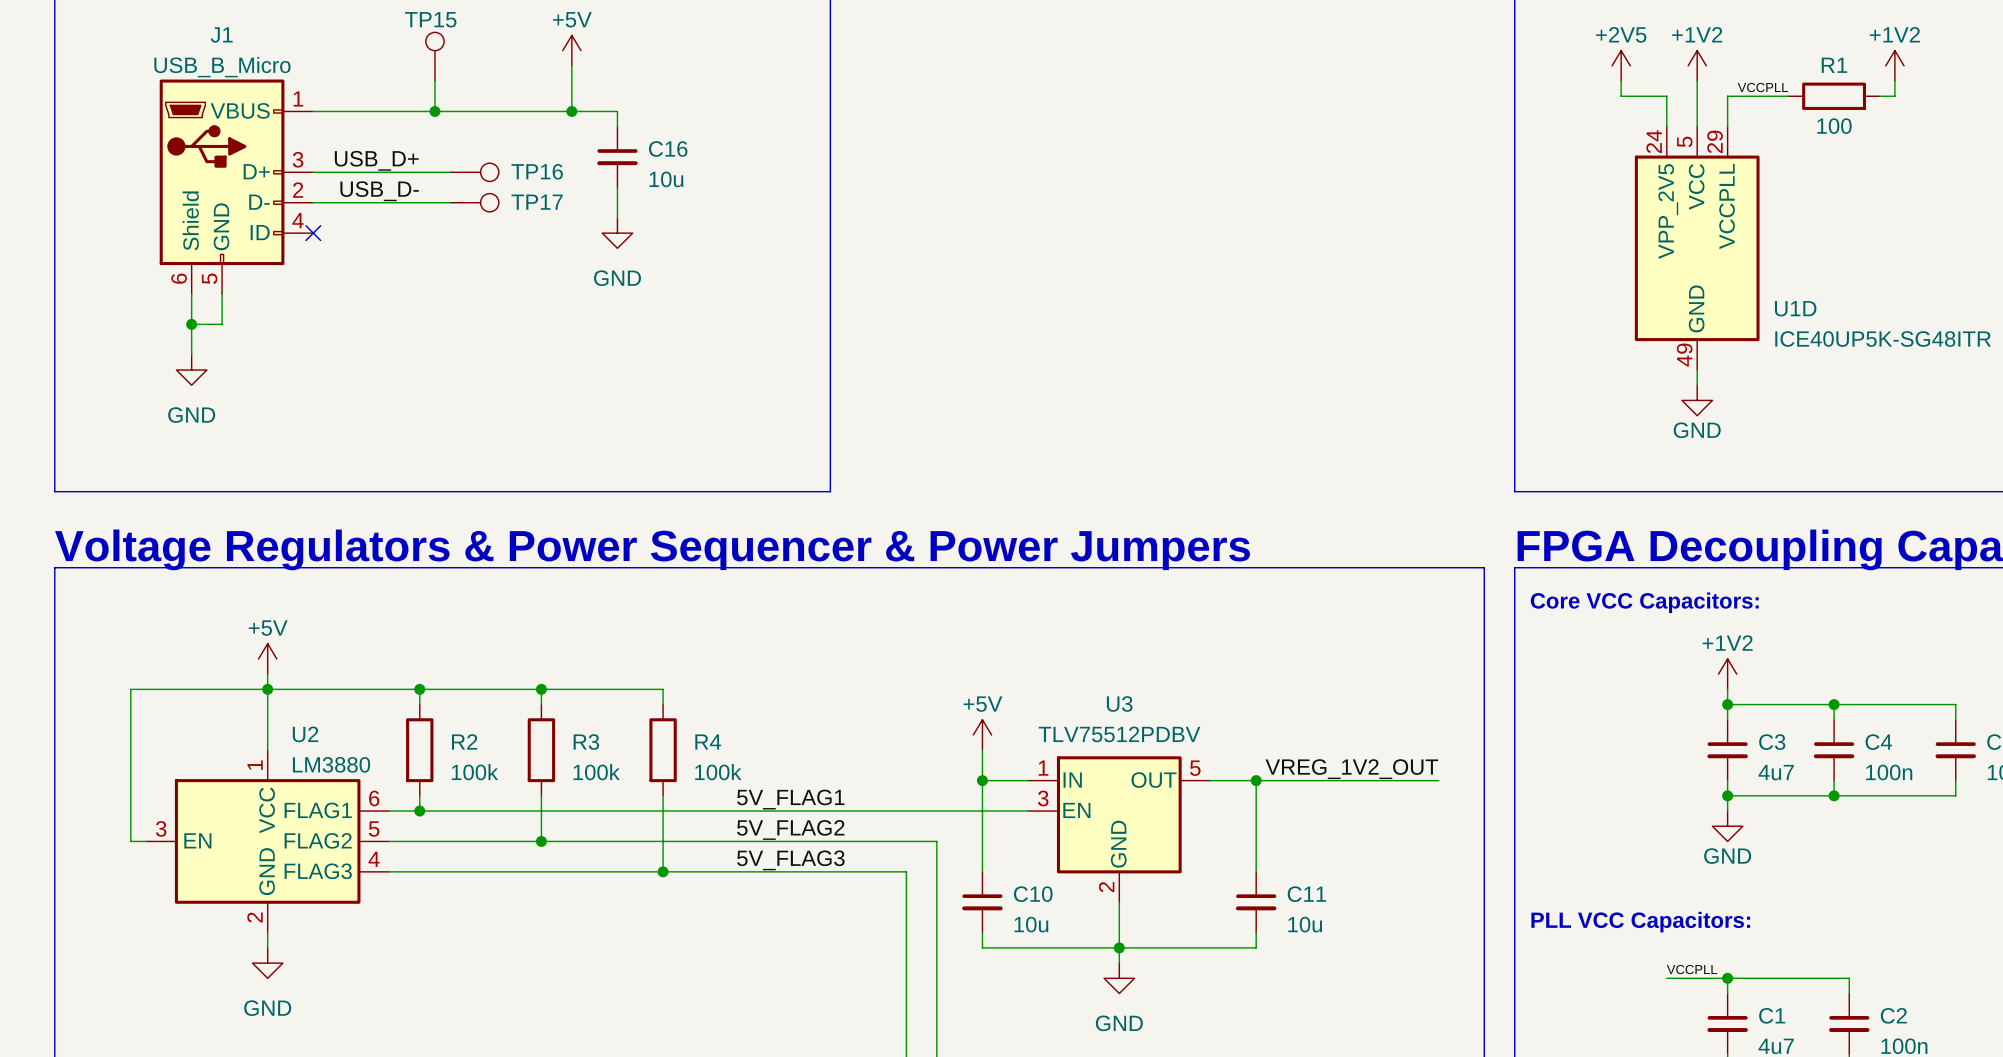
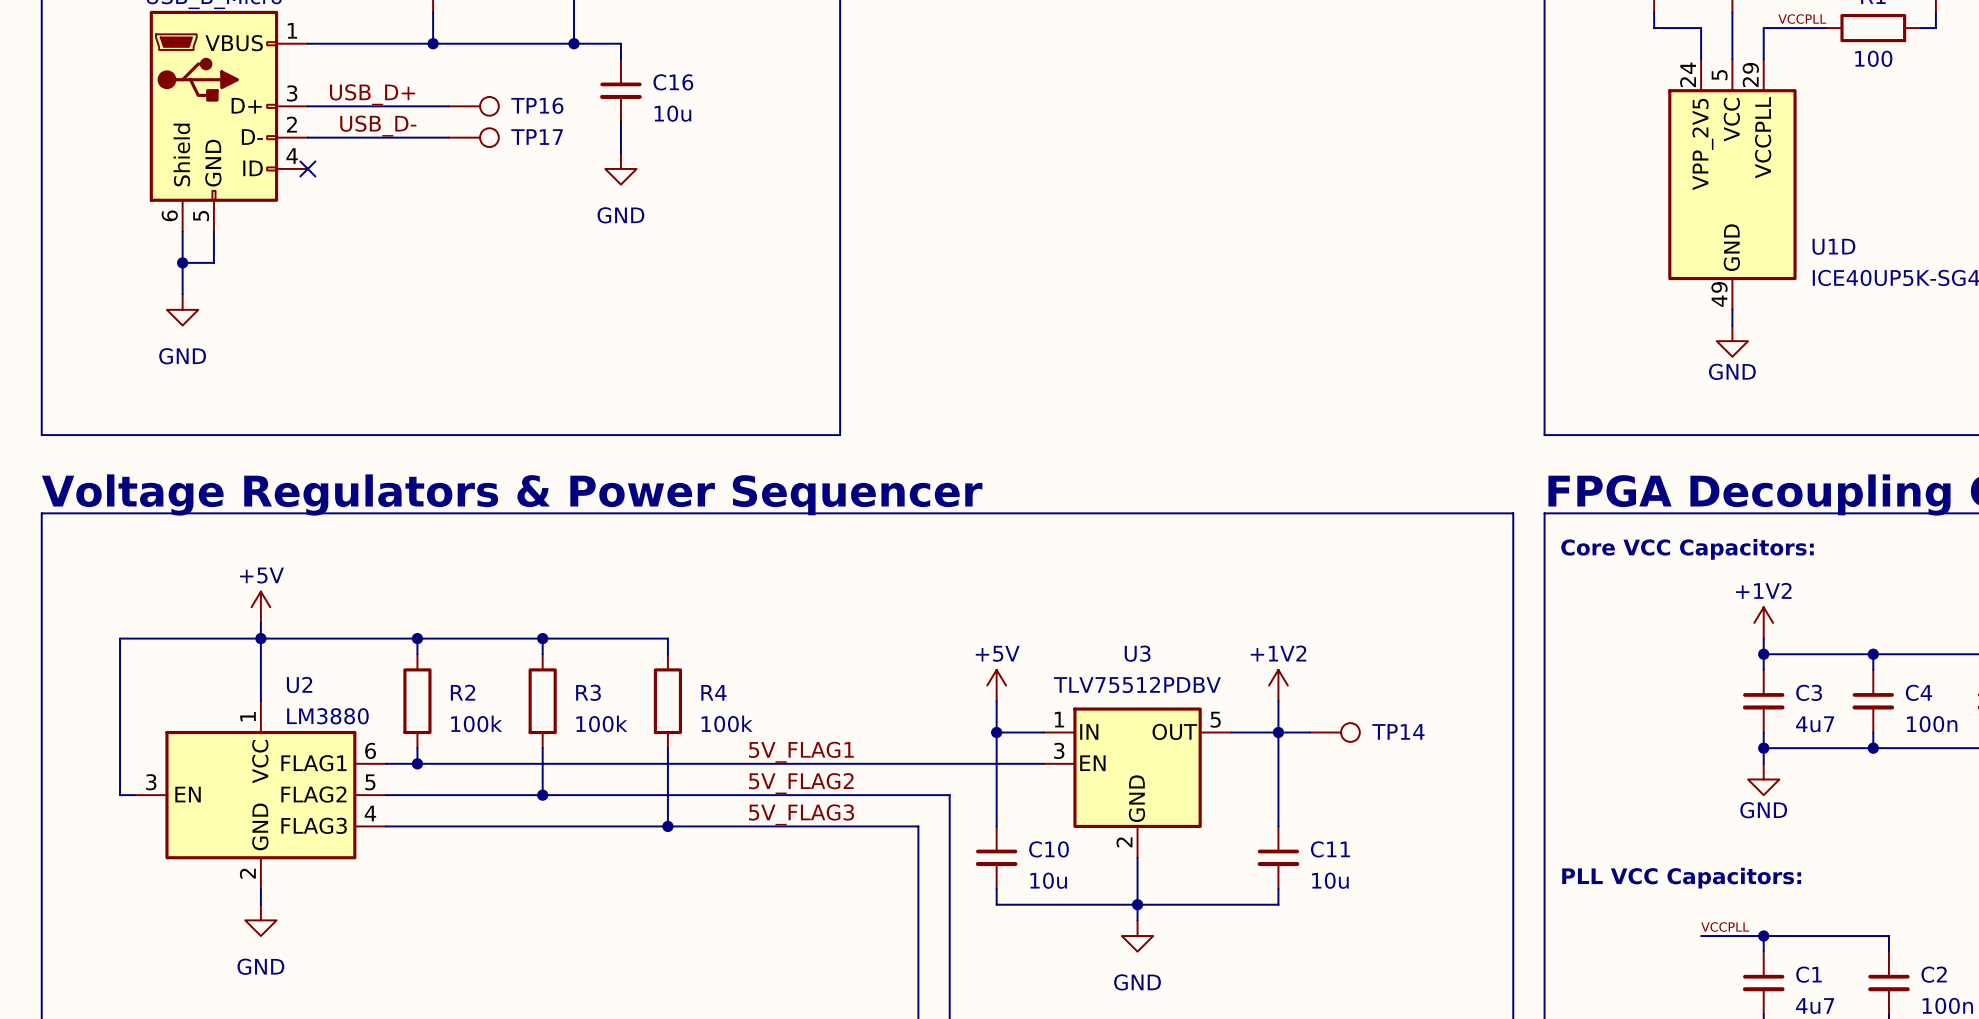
text: Voltage Regulators & Power Sequencer & Power Jumpers (652, 549) -> Voltage Regulators & Power Sequencer (512, 495)
power symbol: none -> +1V2 (1278, 685)
wire: none -> (1278, 701) (1278, 732)
label: VREG_1V2_OUT (1351, 769) -> none
wire: (1286, 780) (1438, 780) -> none
TP14: none -> (1334, 732)

